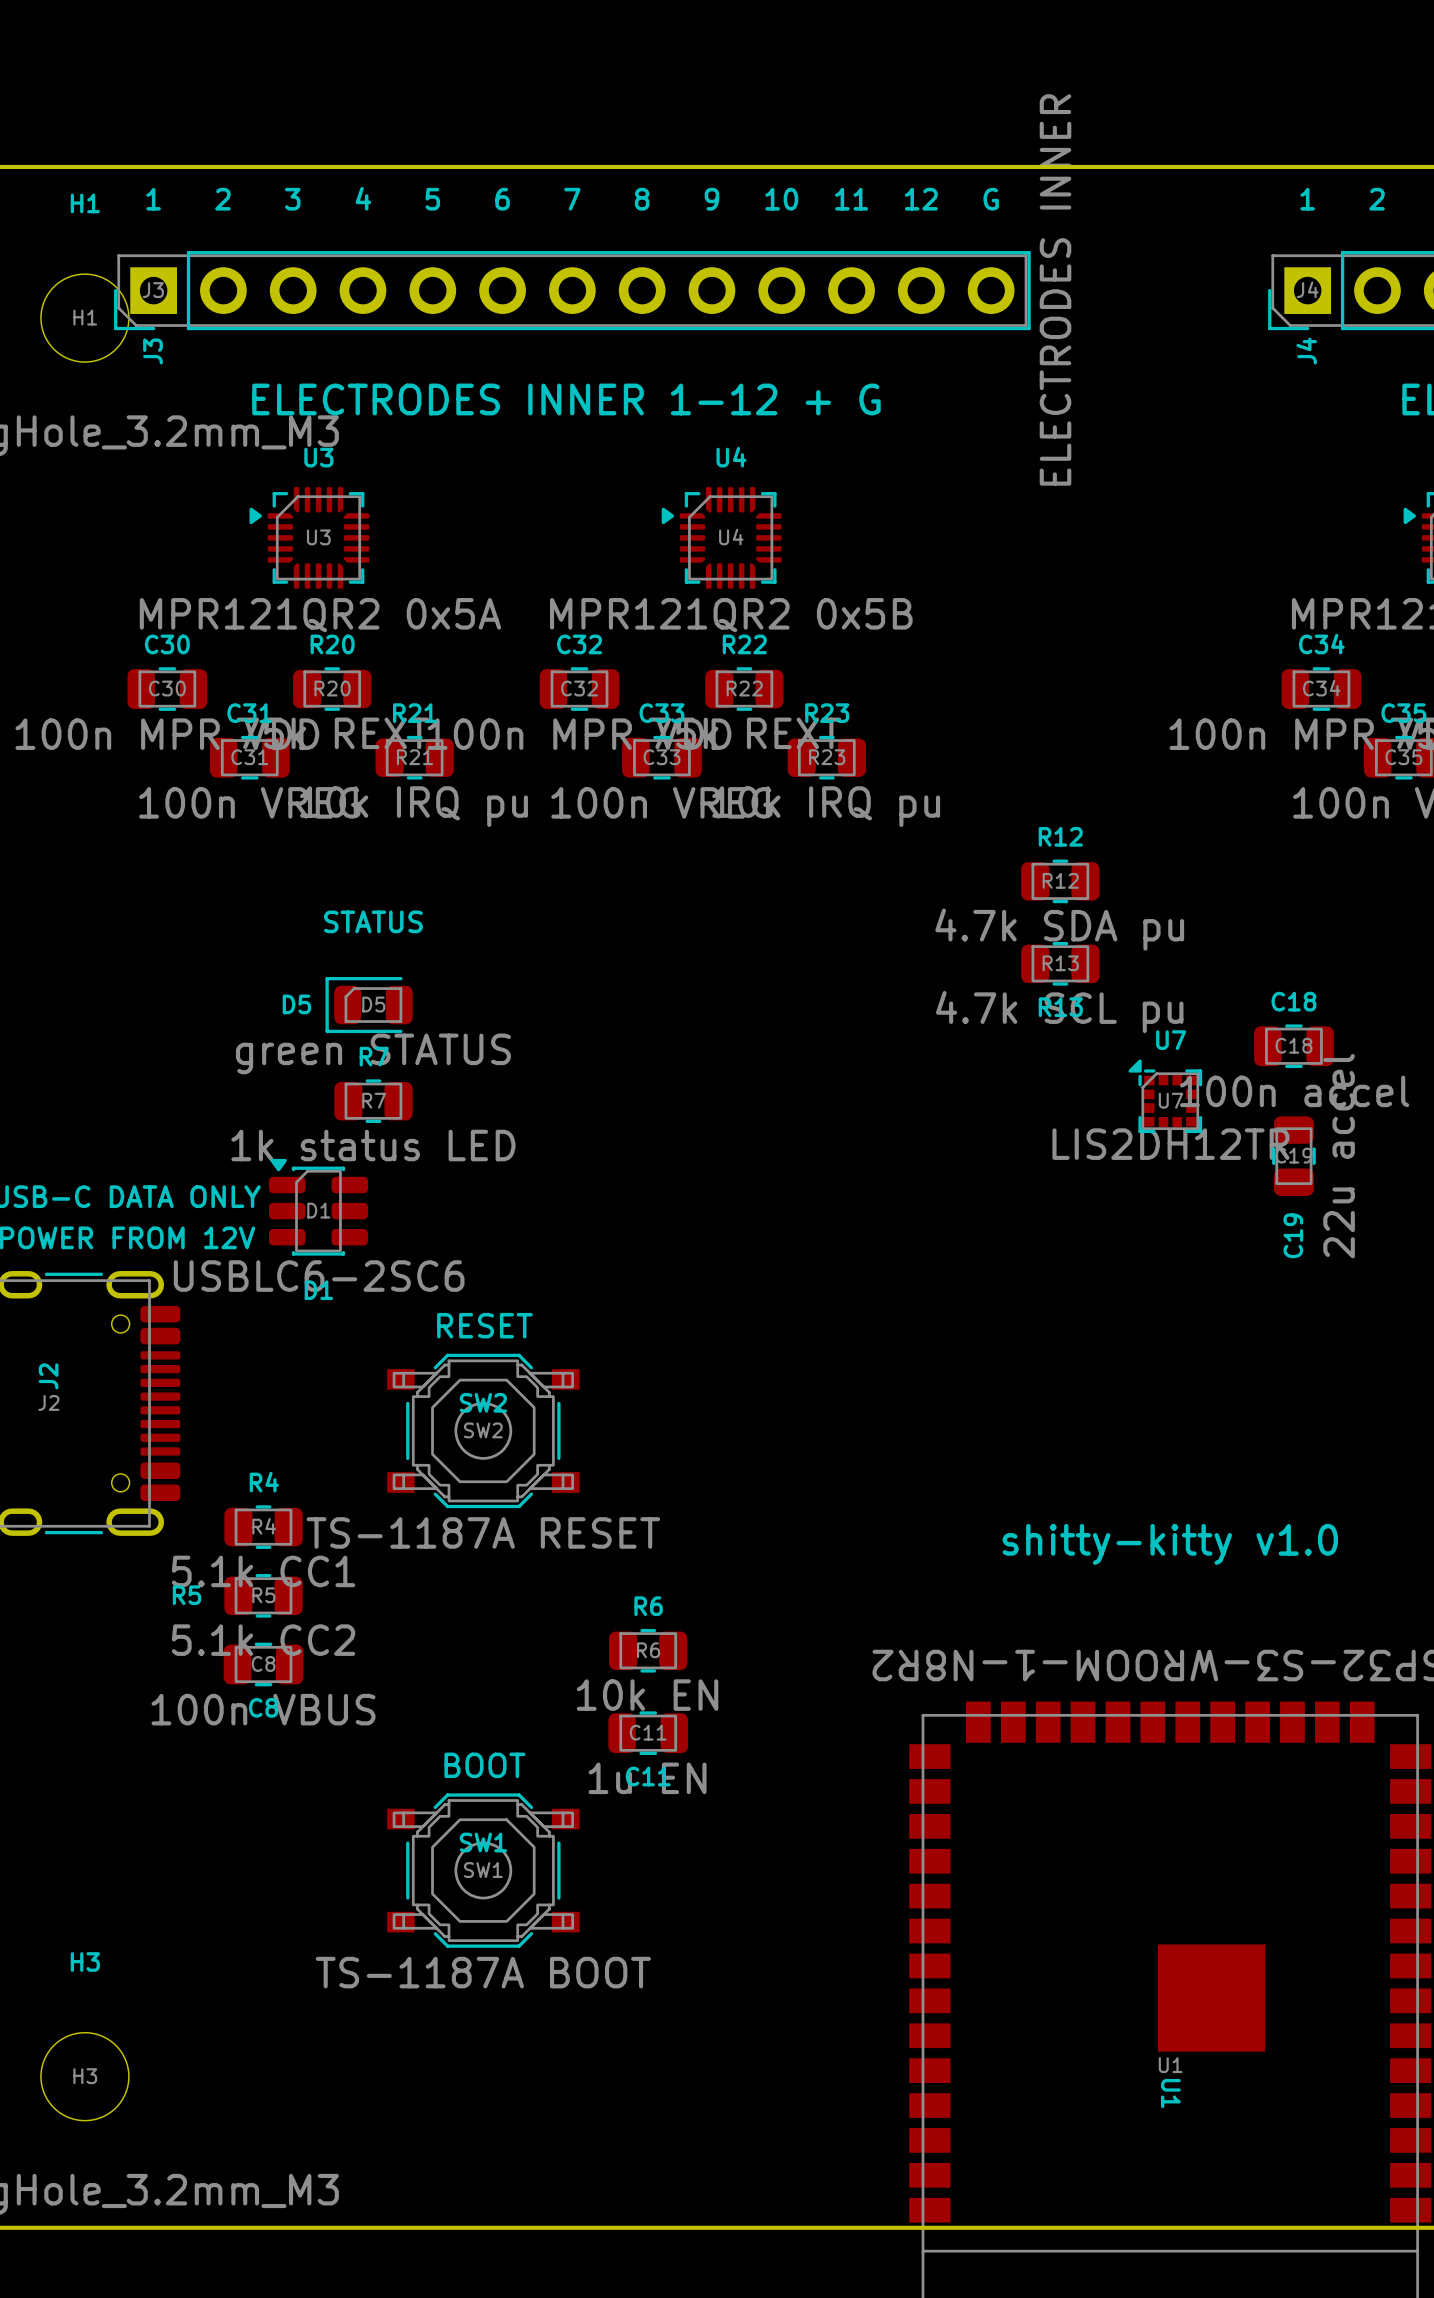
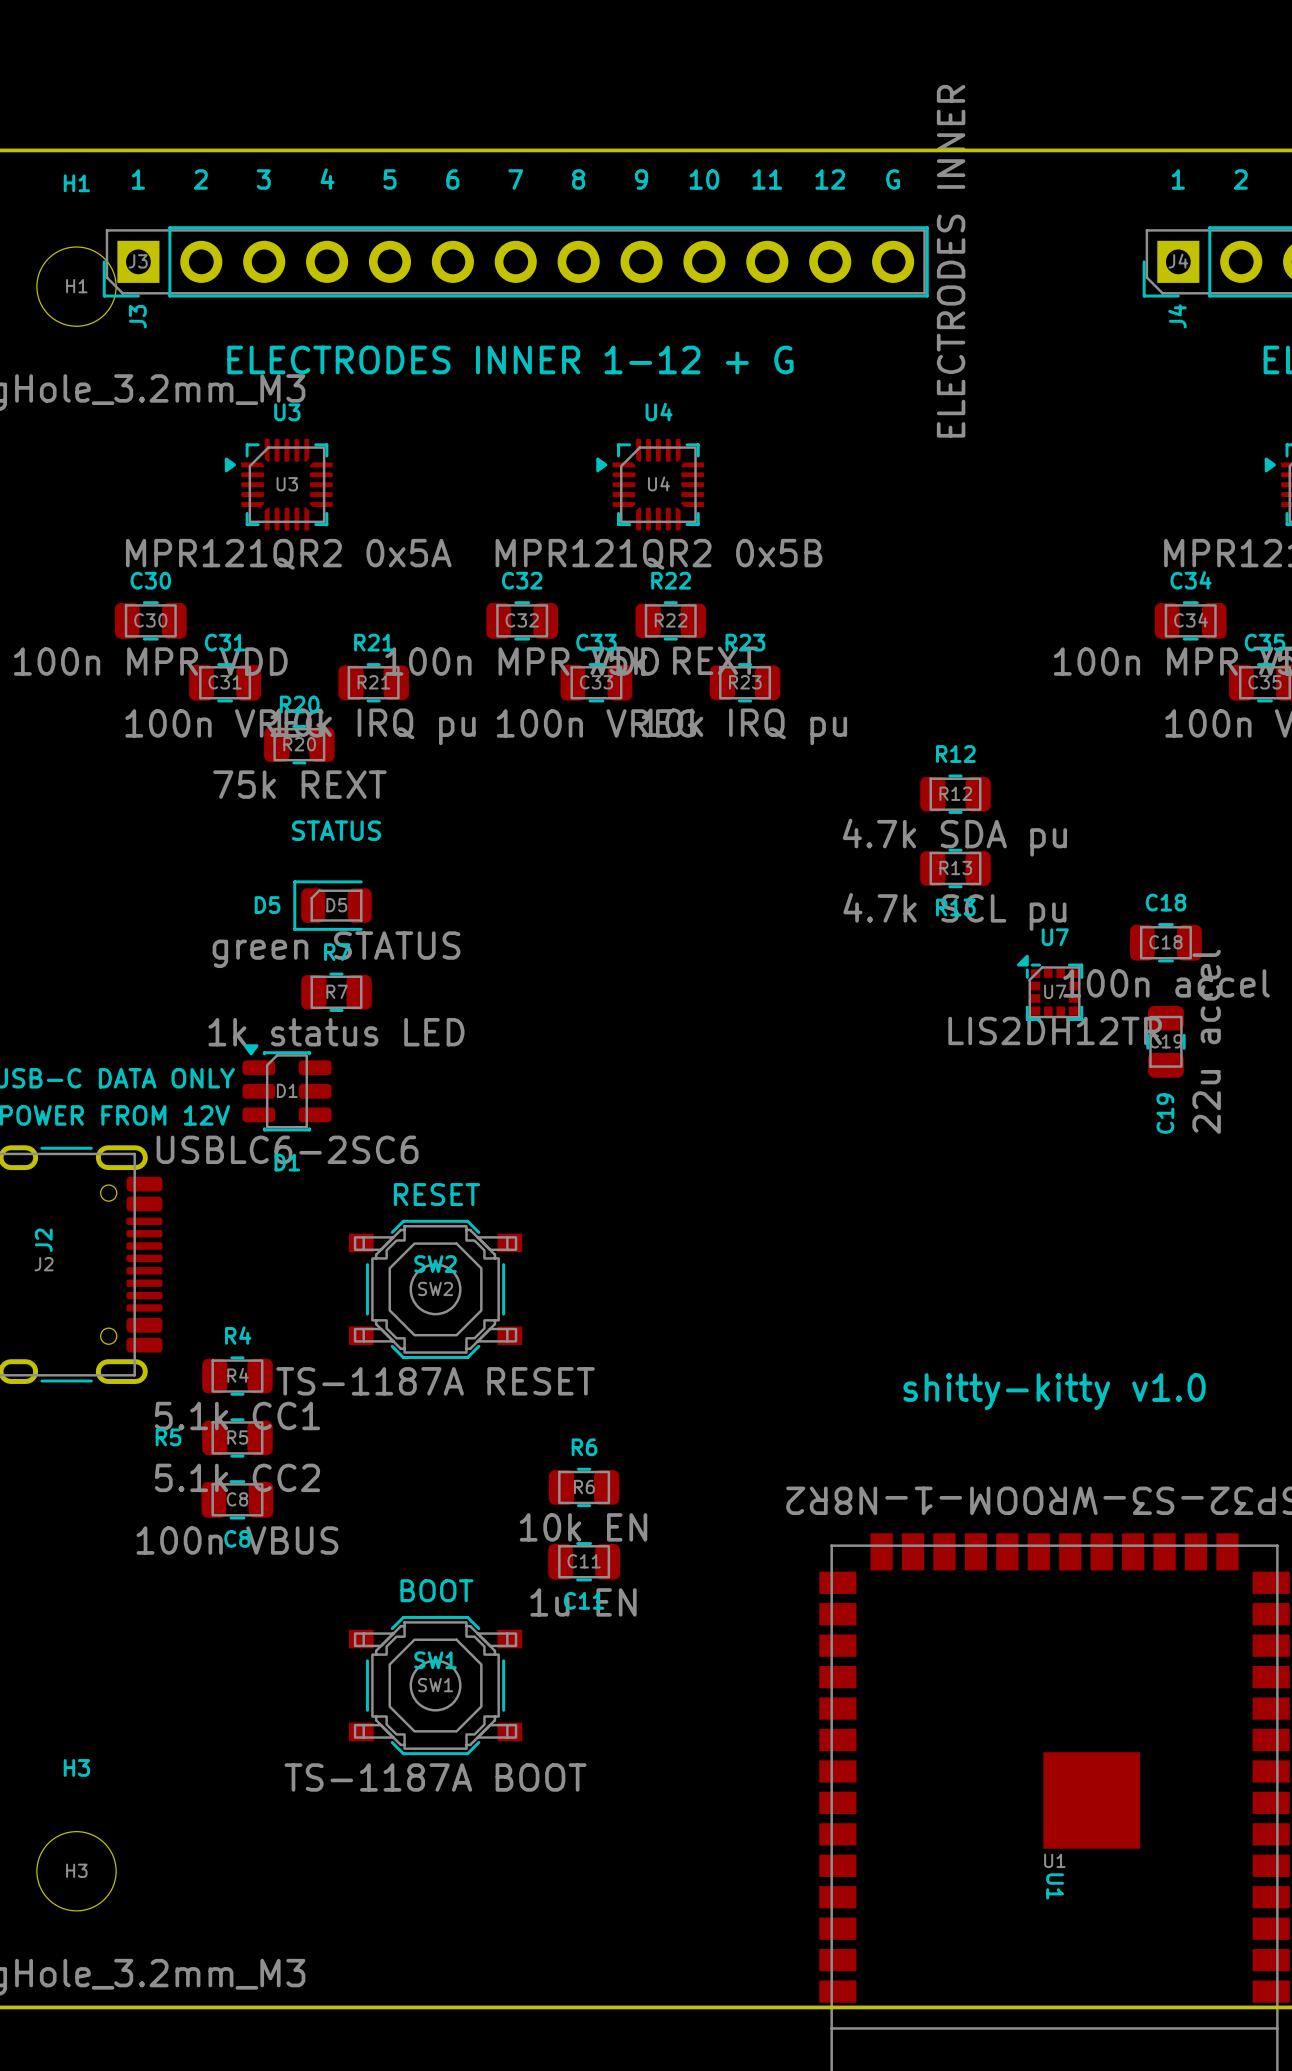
text position: R20 (332, 688) -> R20 (299, 744)
R20 position: (332, 689) -> (299, 744)

